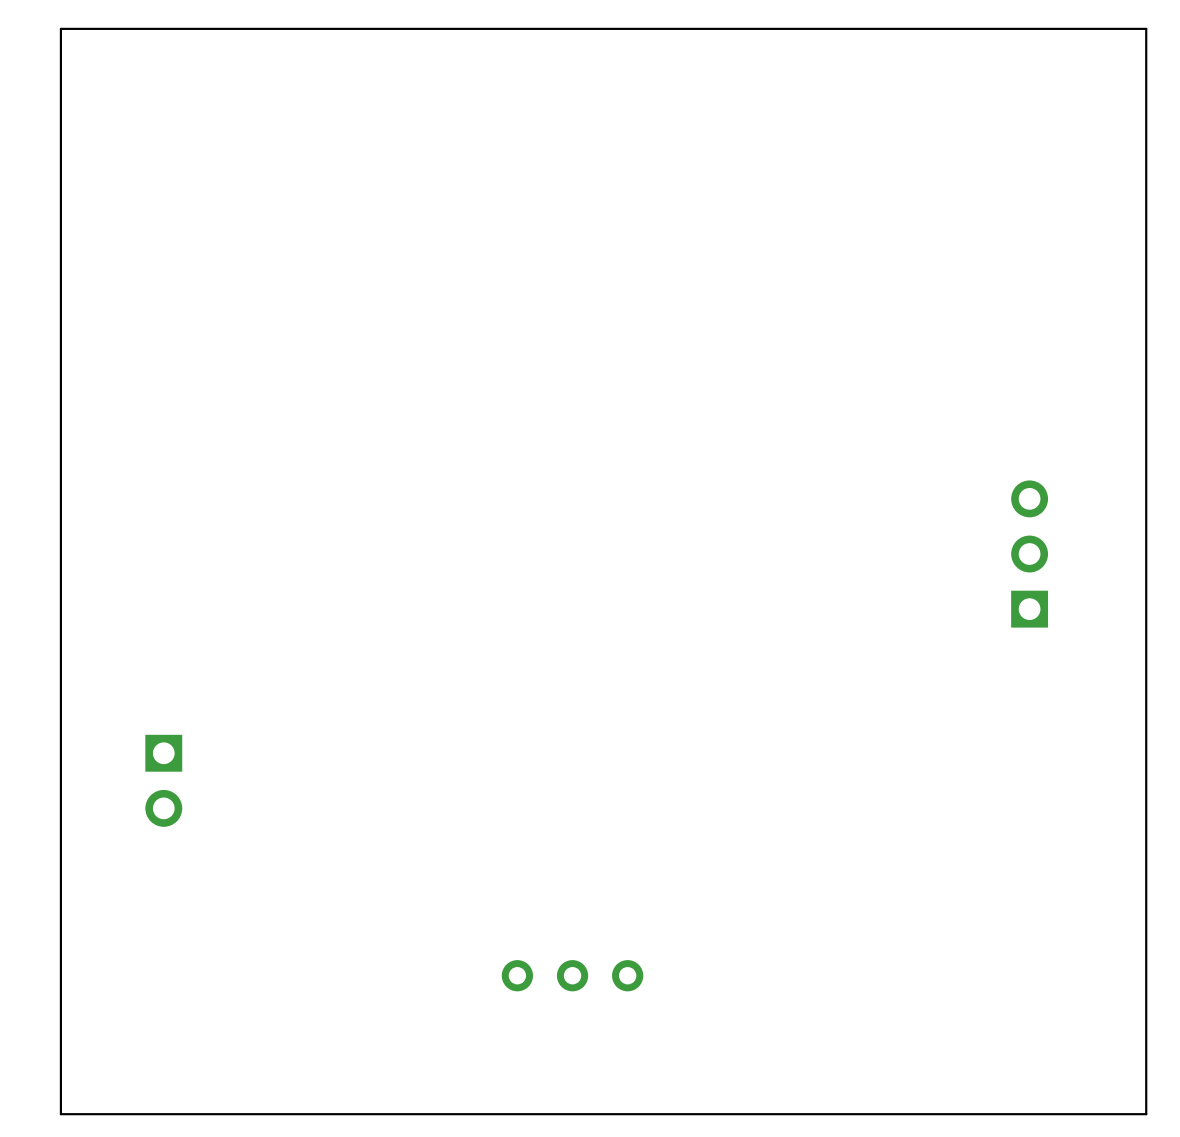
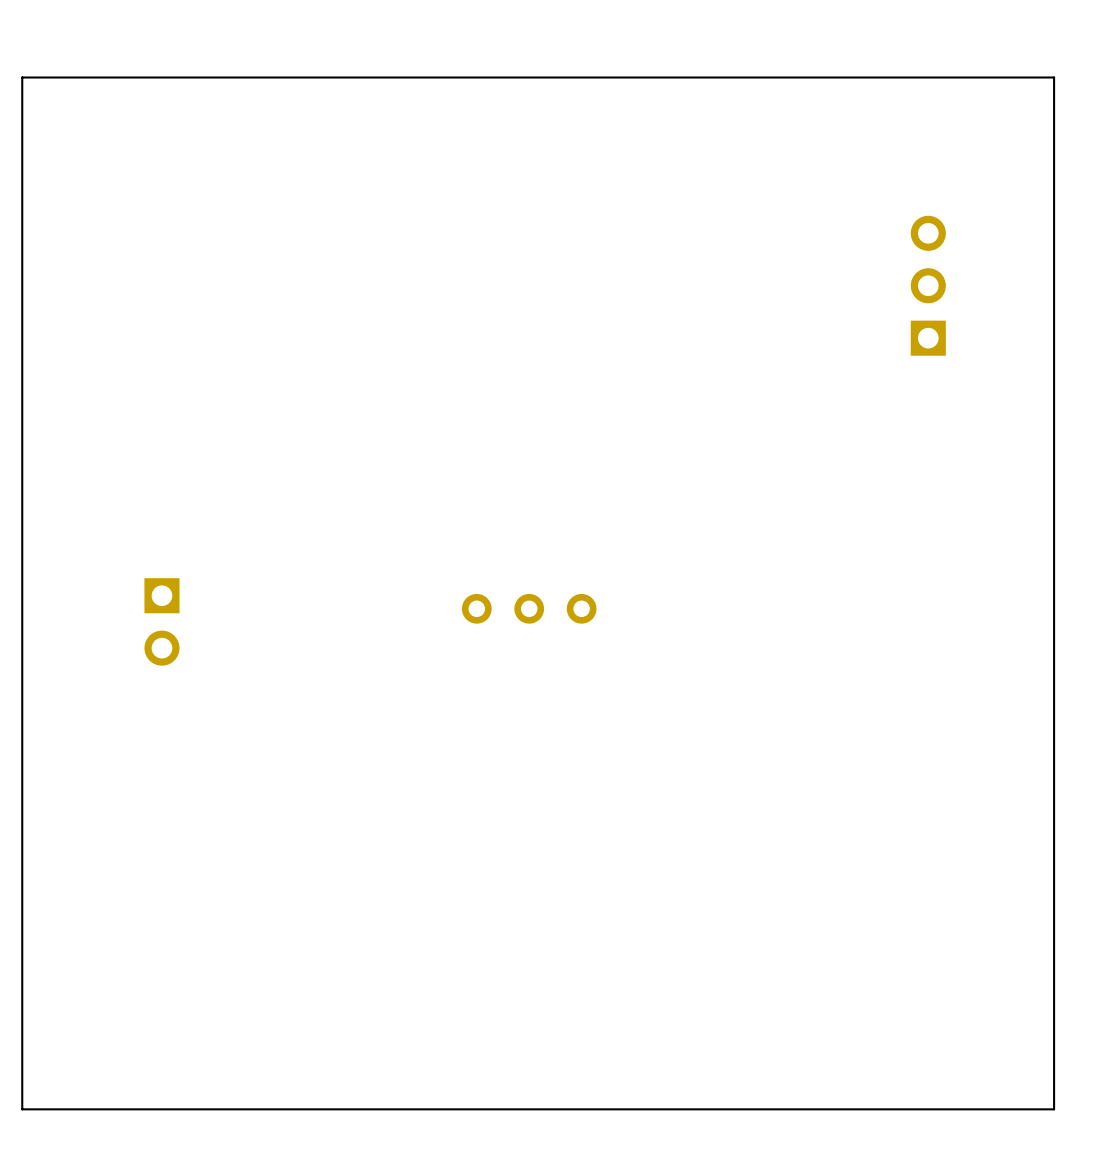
part position: (1029, 554) -> (928, 285)
part position: (163, 780) -> (161, 621)
part position: (572, 975) -> (529, 608)

